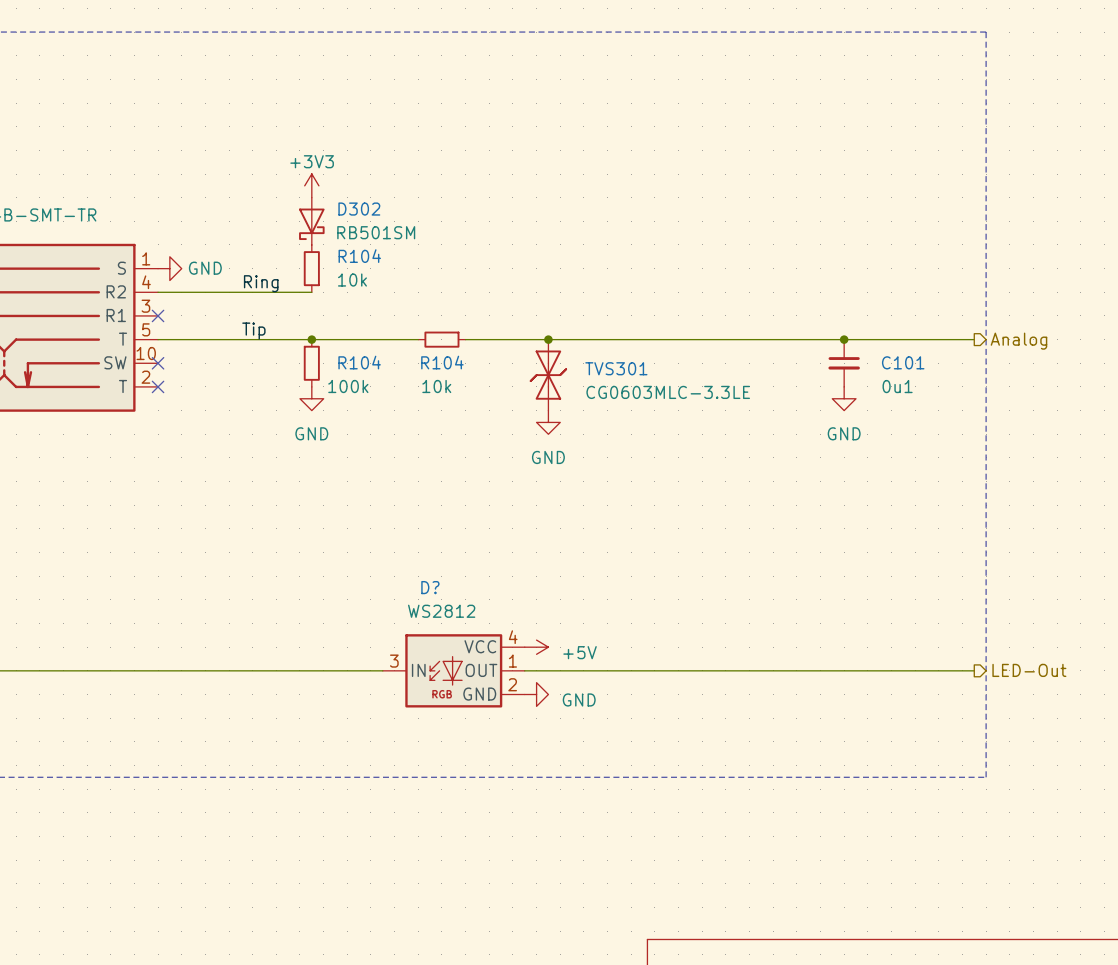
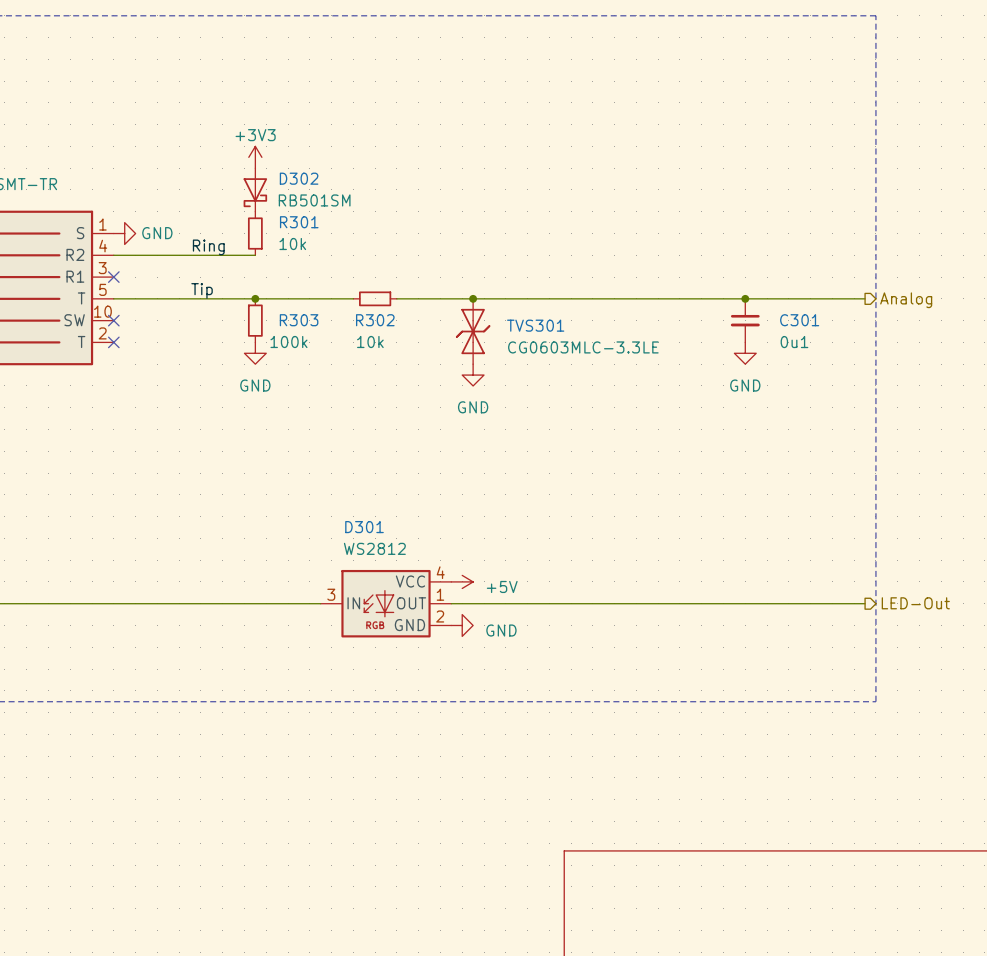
R104 name: R104 (359, 256) -> R301 (299, 222)
R104 name: R104 (359, 362) -> R303 (299, 320)
R104 name: R104 (442, 362) -> R302 (375, 320)
C101 name: C101 (903, 362) -> C301 (799, 320)
D? name: D? (430, 587) -> D301 (364, 527)

